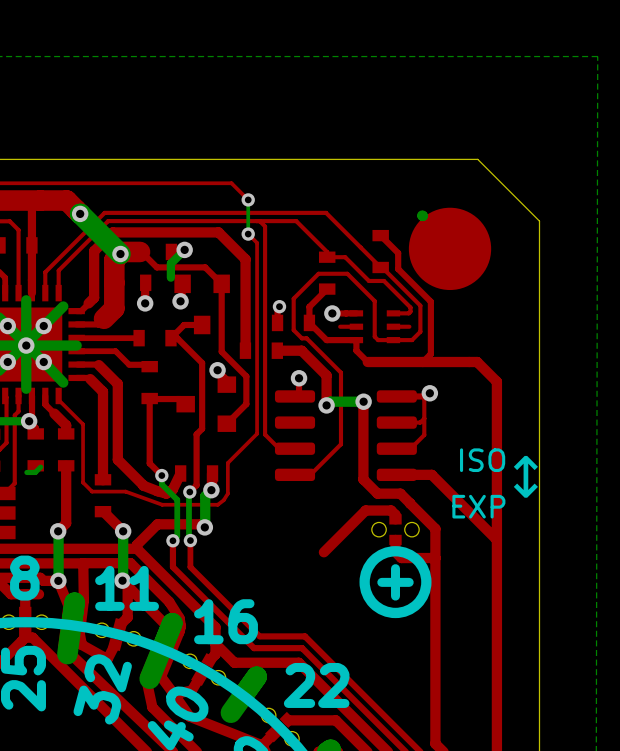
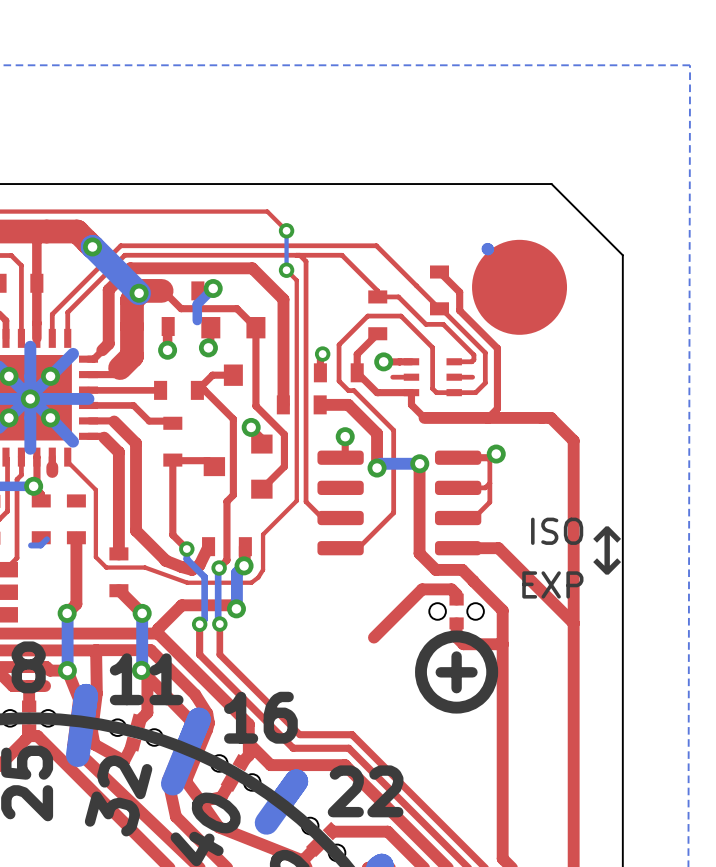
top track: (45, 404) (66, 425) (66, 433) -> (52, 466) (52, 471)

